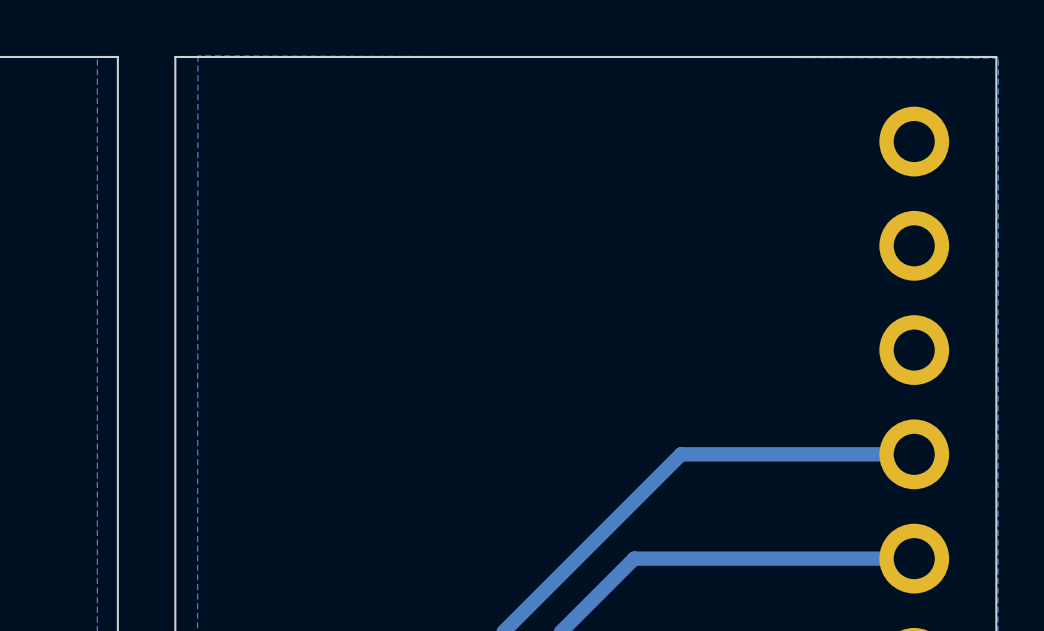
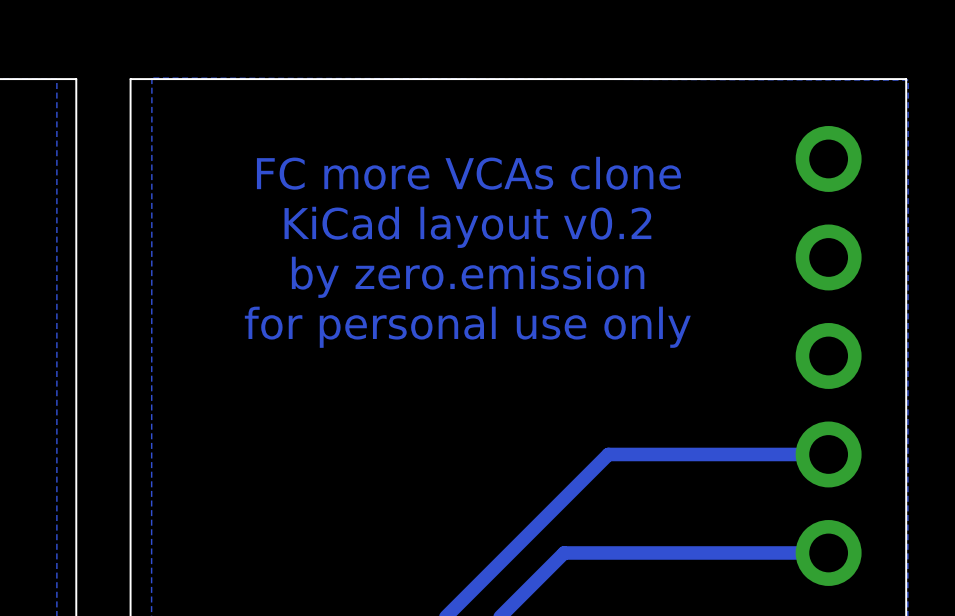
text: none -> FC more VCAs clone (468, 173)
text: none -> KiCad layout v0.2 (467, 227)
text: none -> by zero.emission (468, 277)
text: none -> for personal use only (467, 327)

